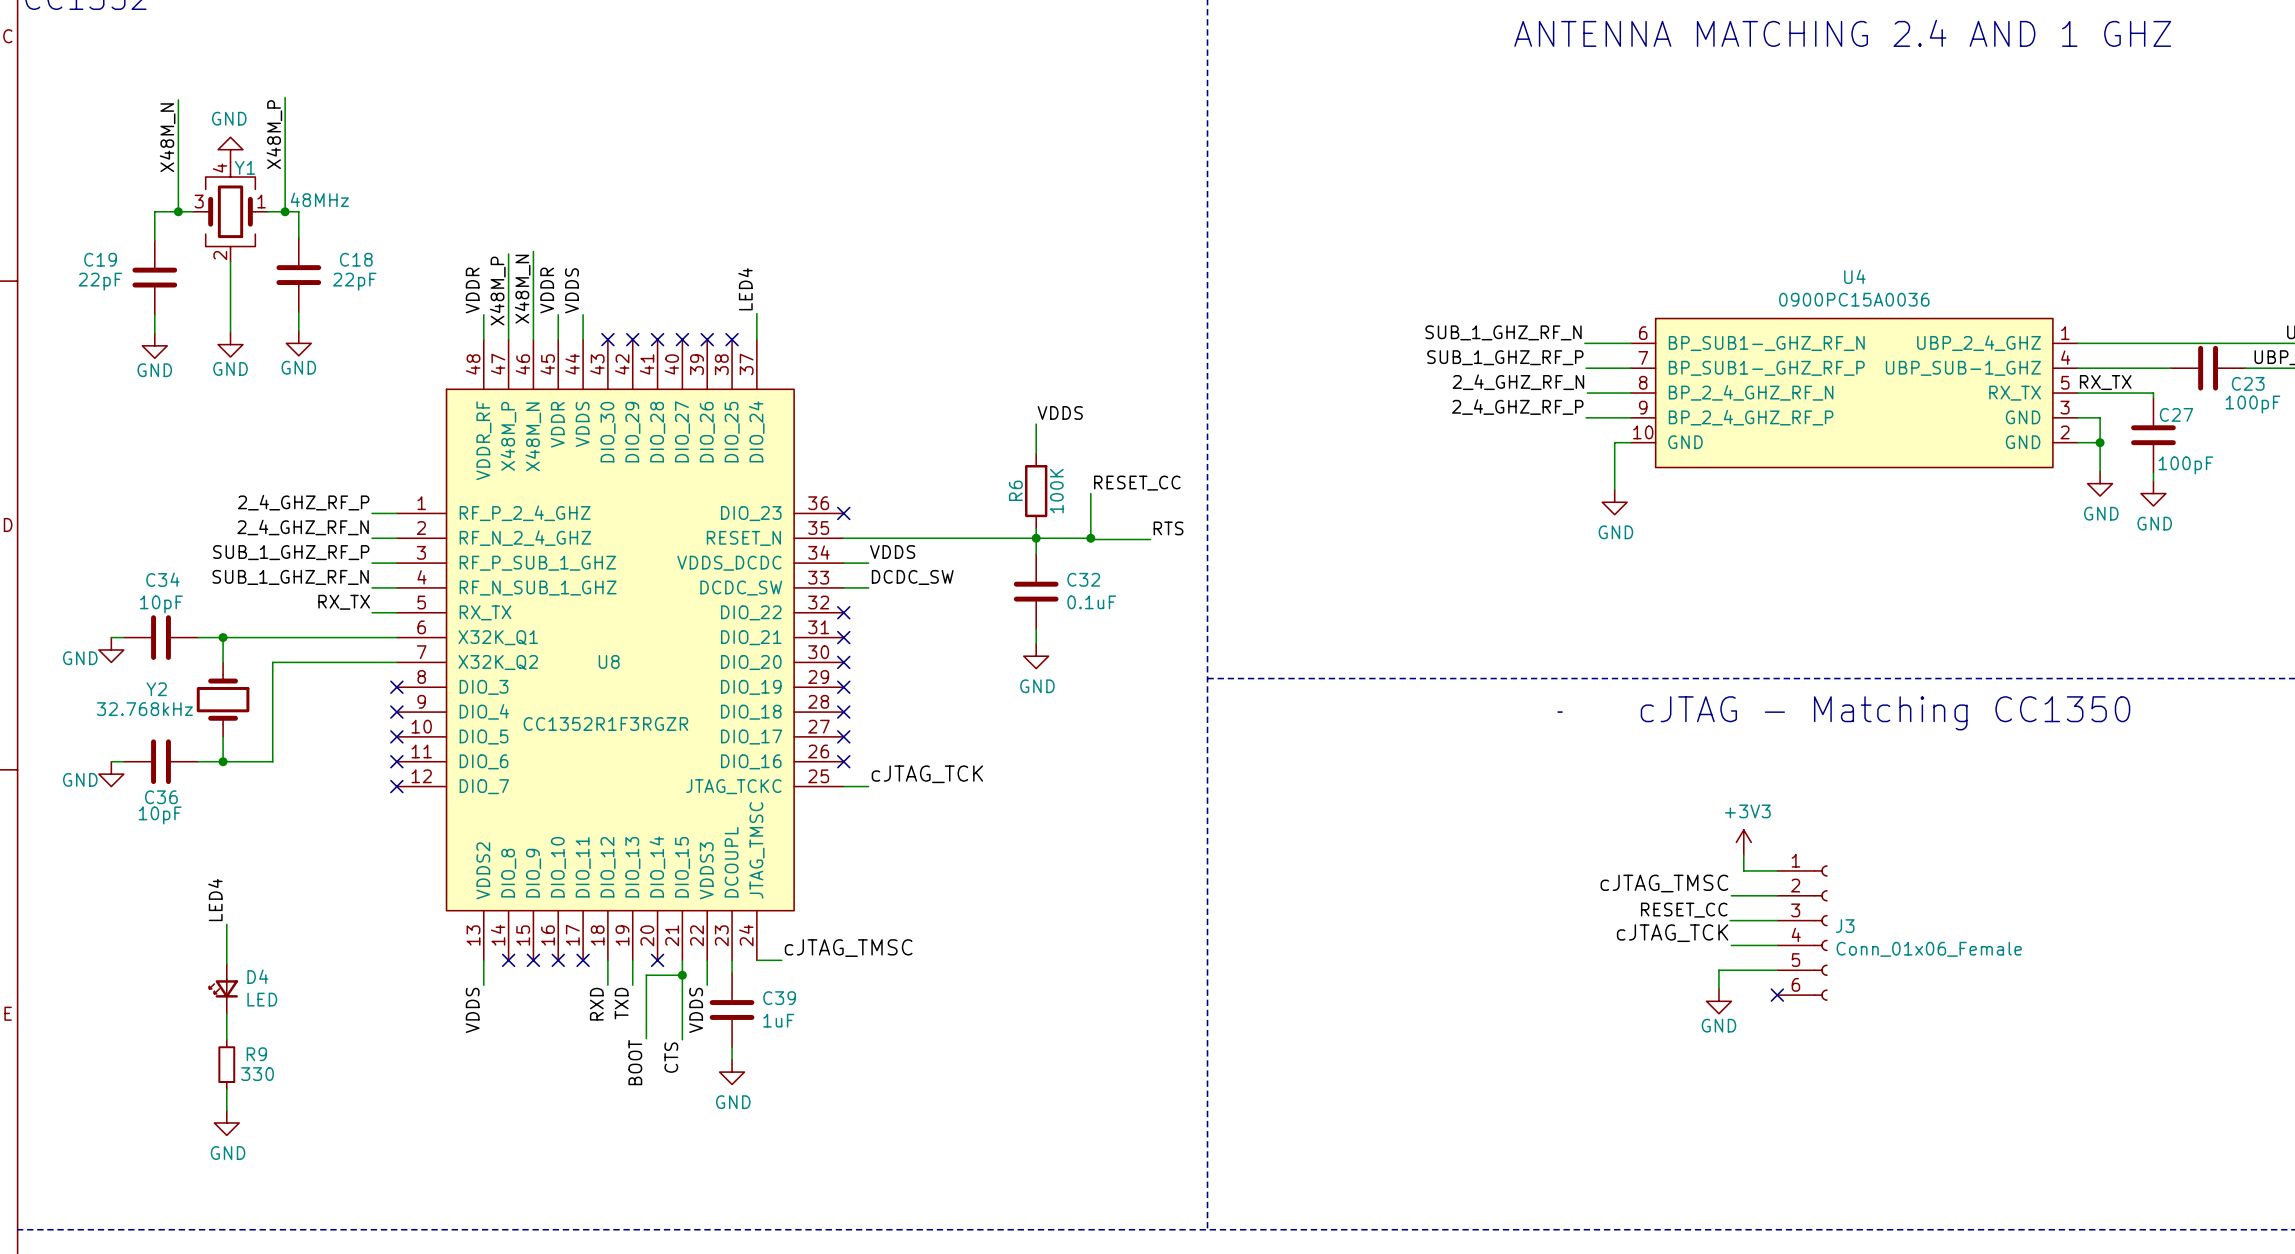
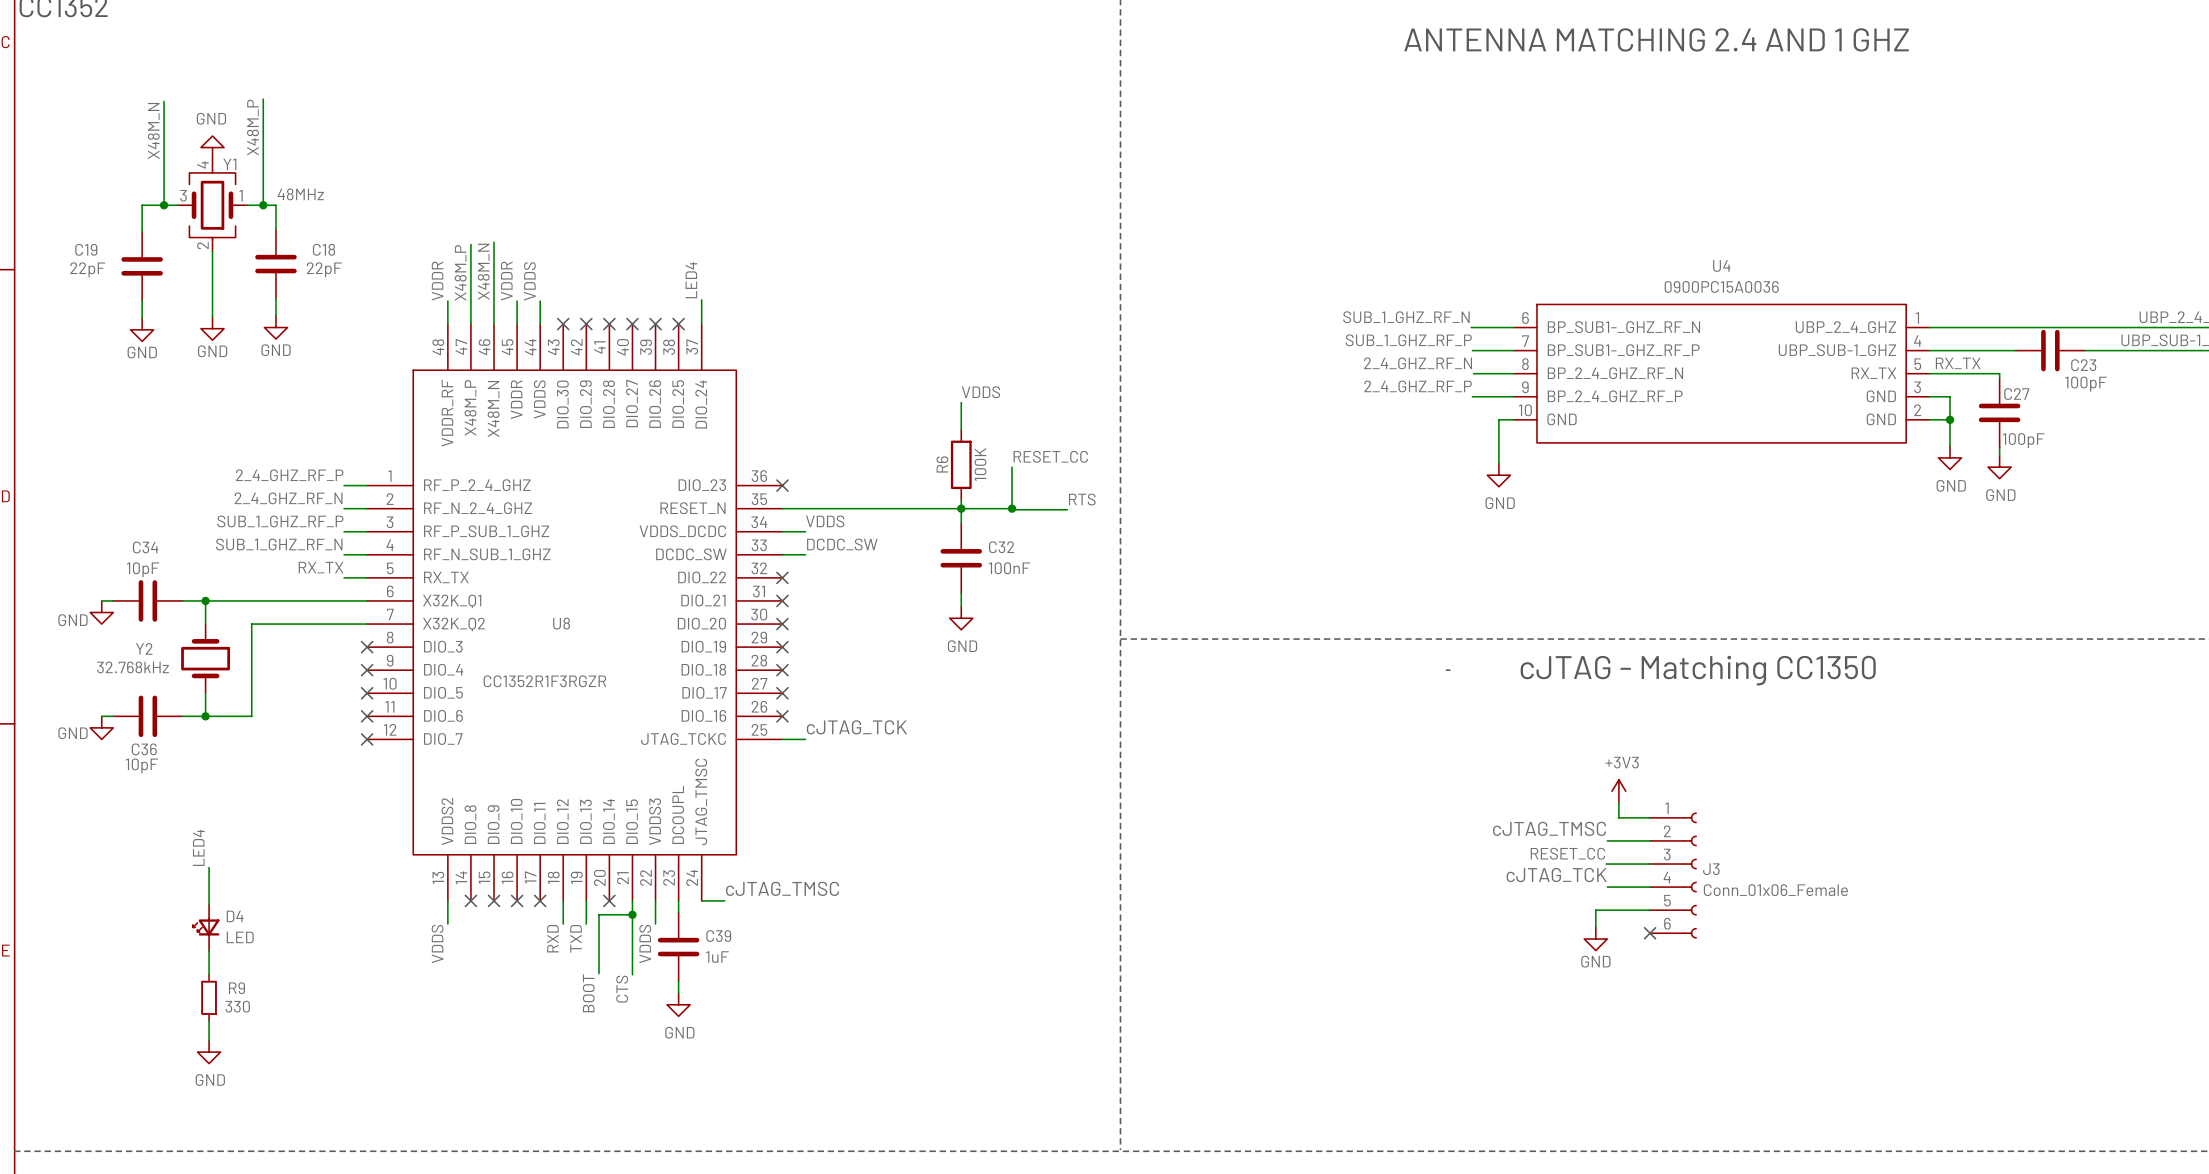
C32 value: 0.1uF (1091, 602) -> 100nF (1009, 568)

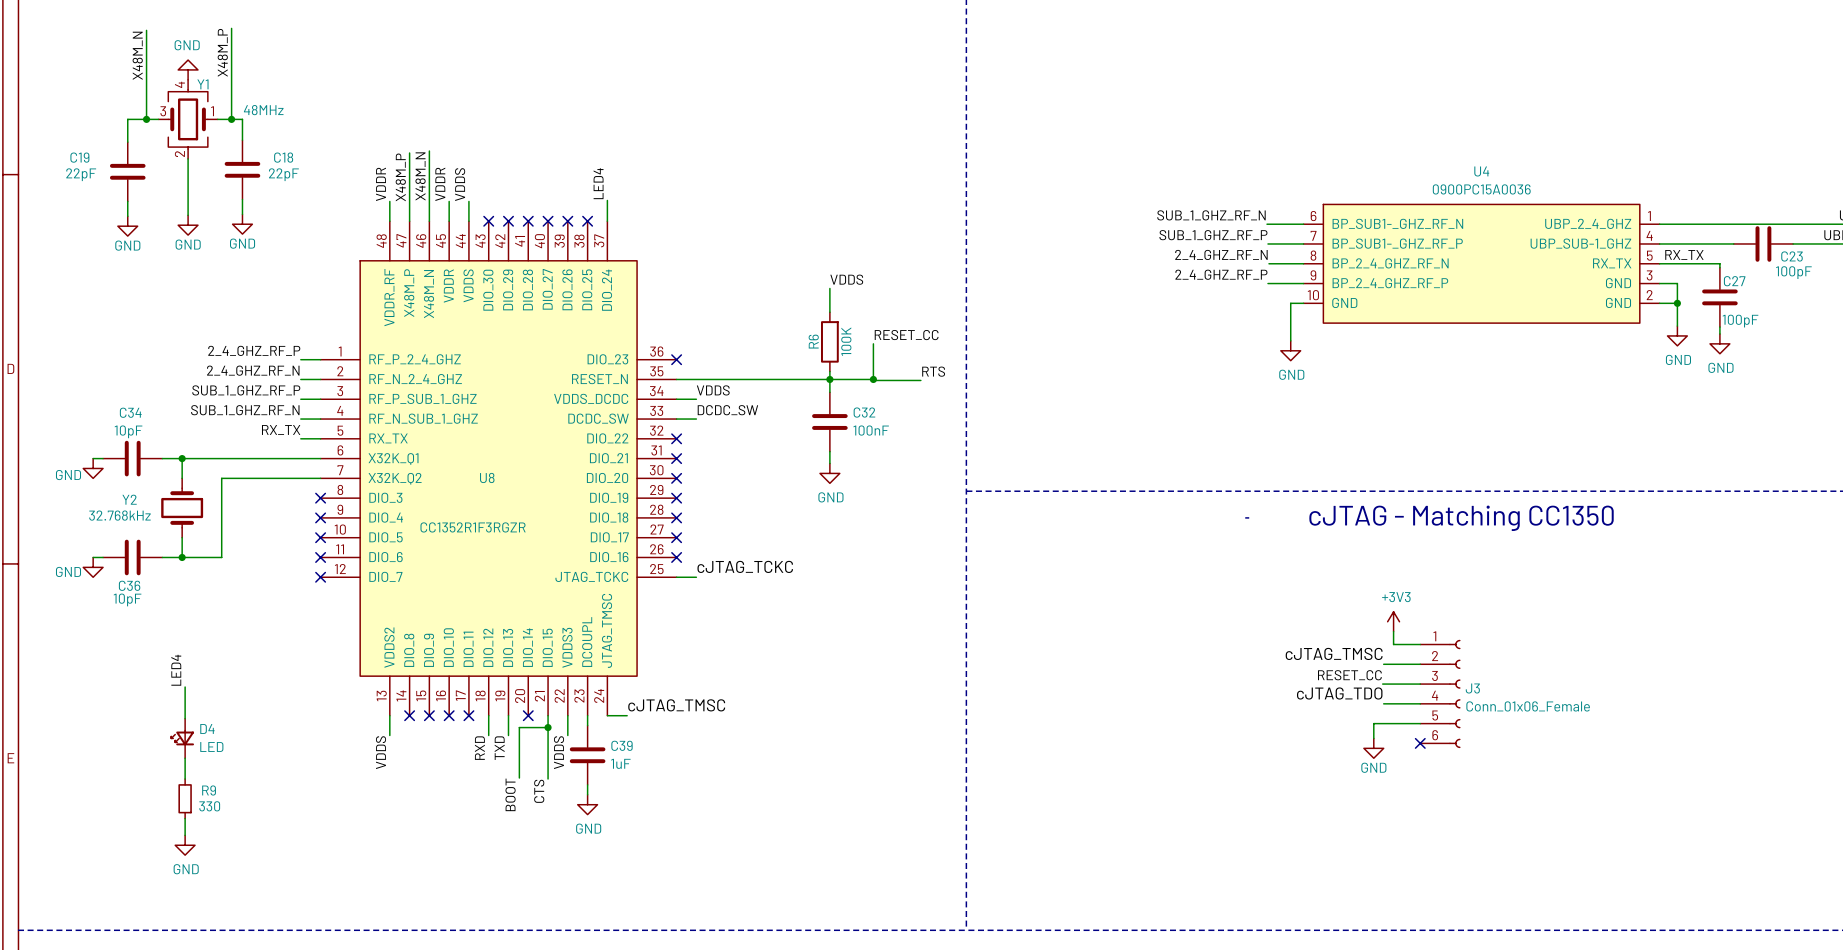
label: cJTAG_TCK (856, 727) -> cJTAG_TCKC (745, 566)
label: cJTAG_TCK (1556, 875) -> cJTAG_TDO (1339, 693)

